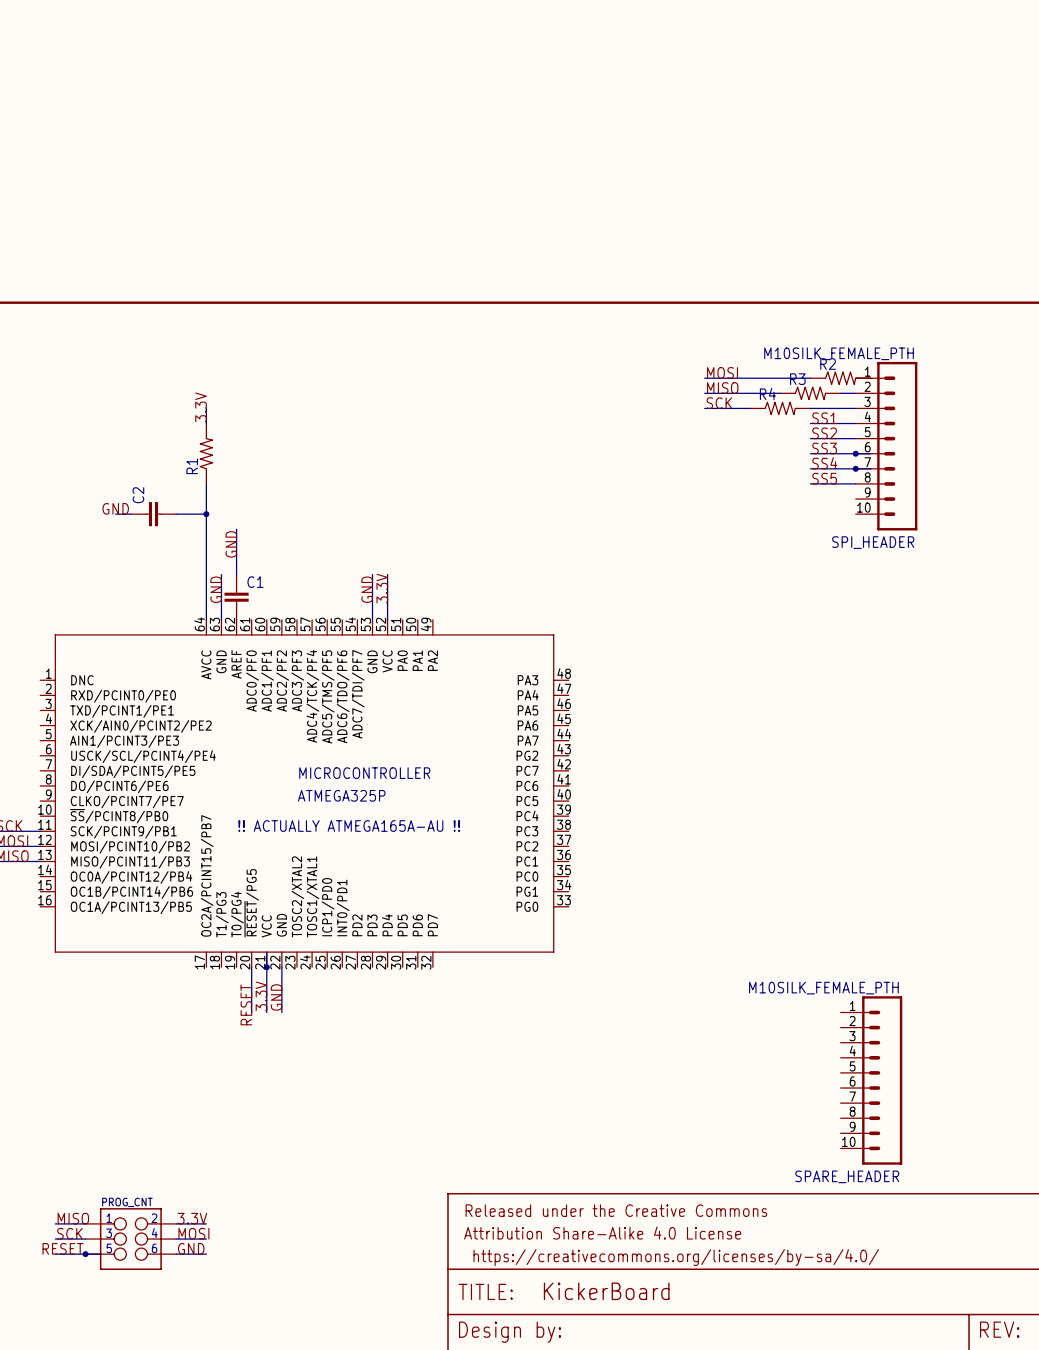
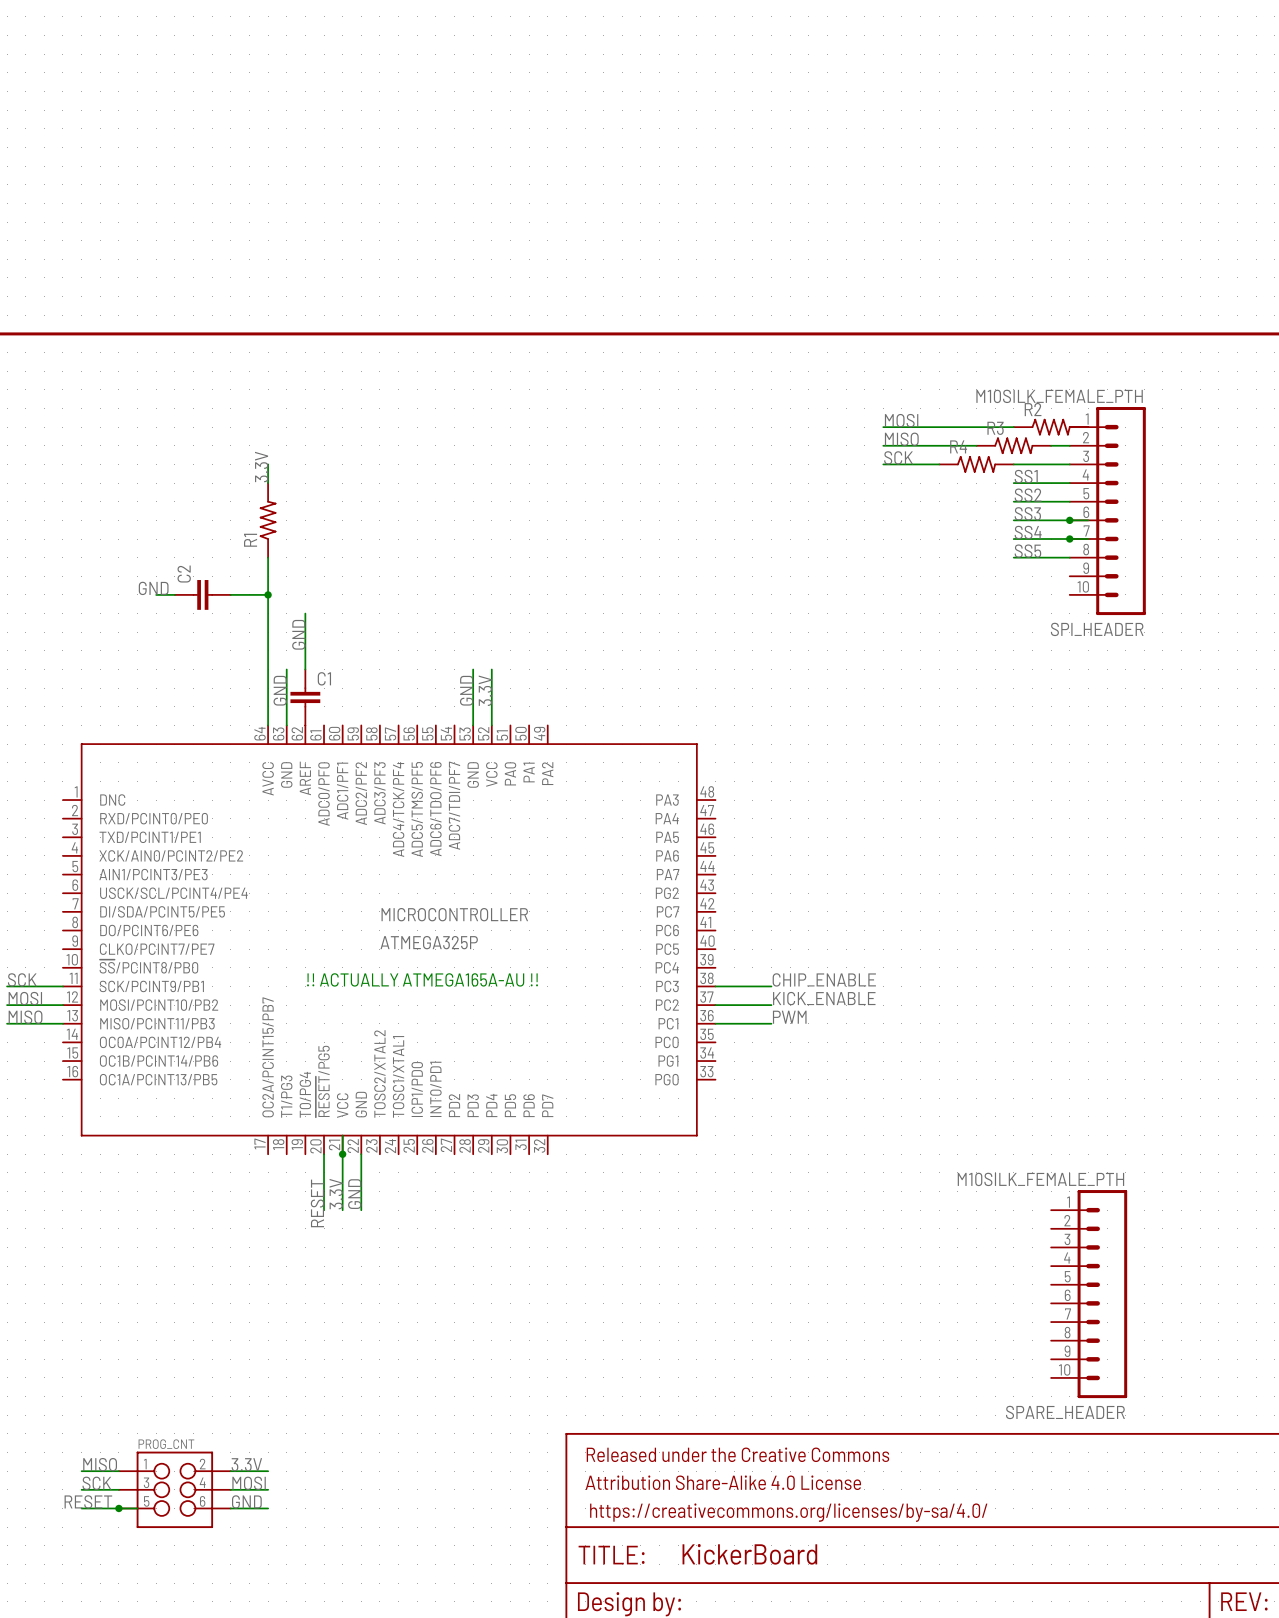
label: none -> CHIP_ENABLE (824, 979)
wire: none -> (715, 986) (771, 986)
label: none -> KICK_ENABLE (824, 998)
wire: none -> (715, 1005) (771, 1005)
label: none -> PWM (789, 1017)
wire: none -> (715, 1023) (771, 1023)

